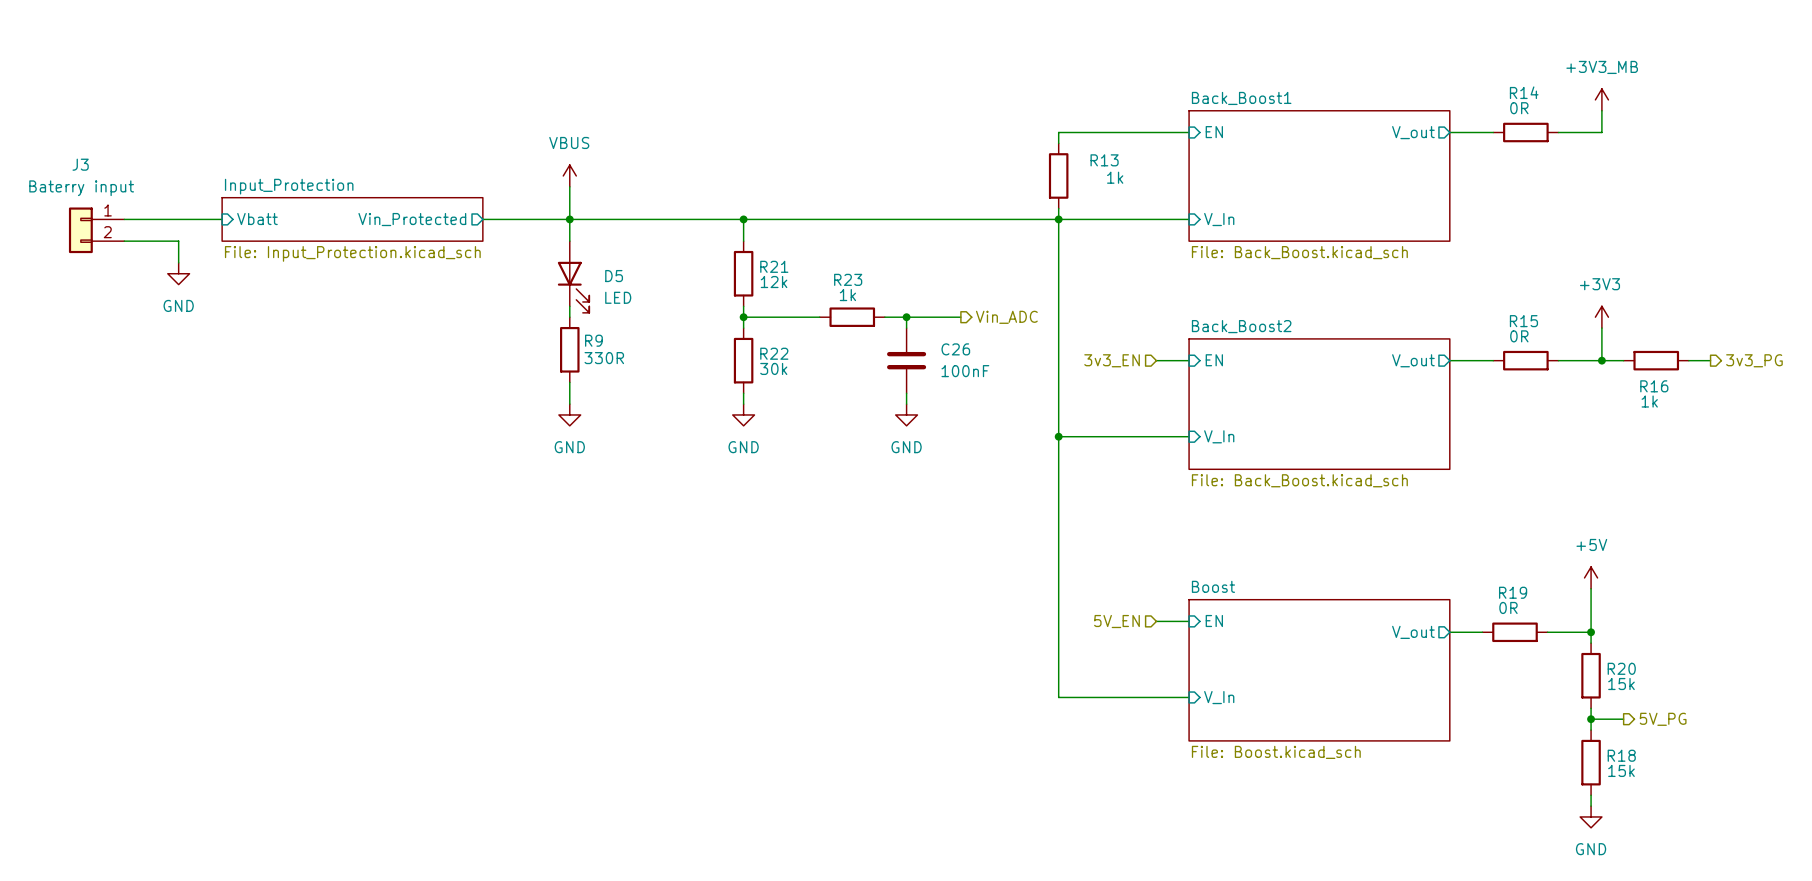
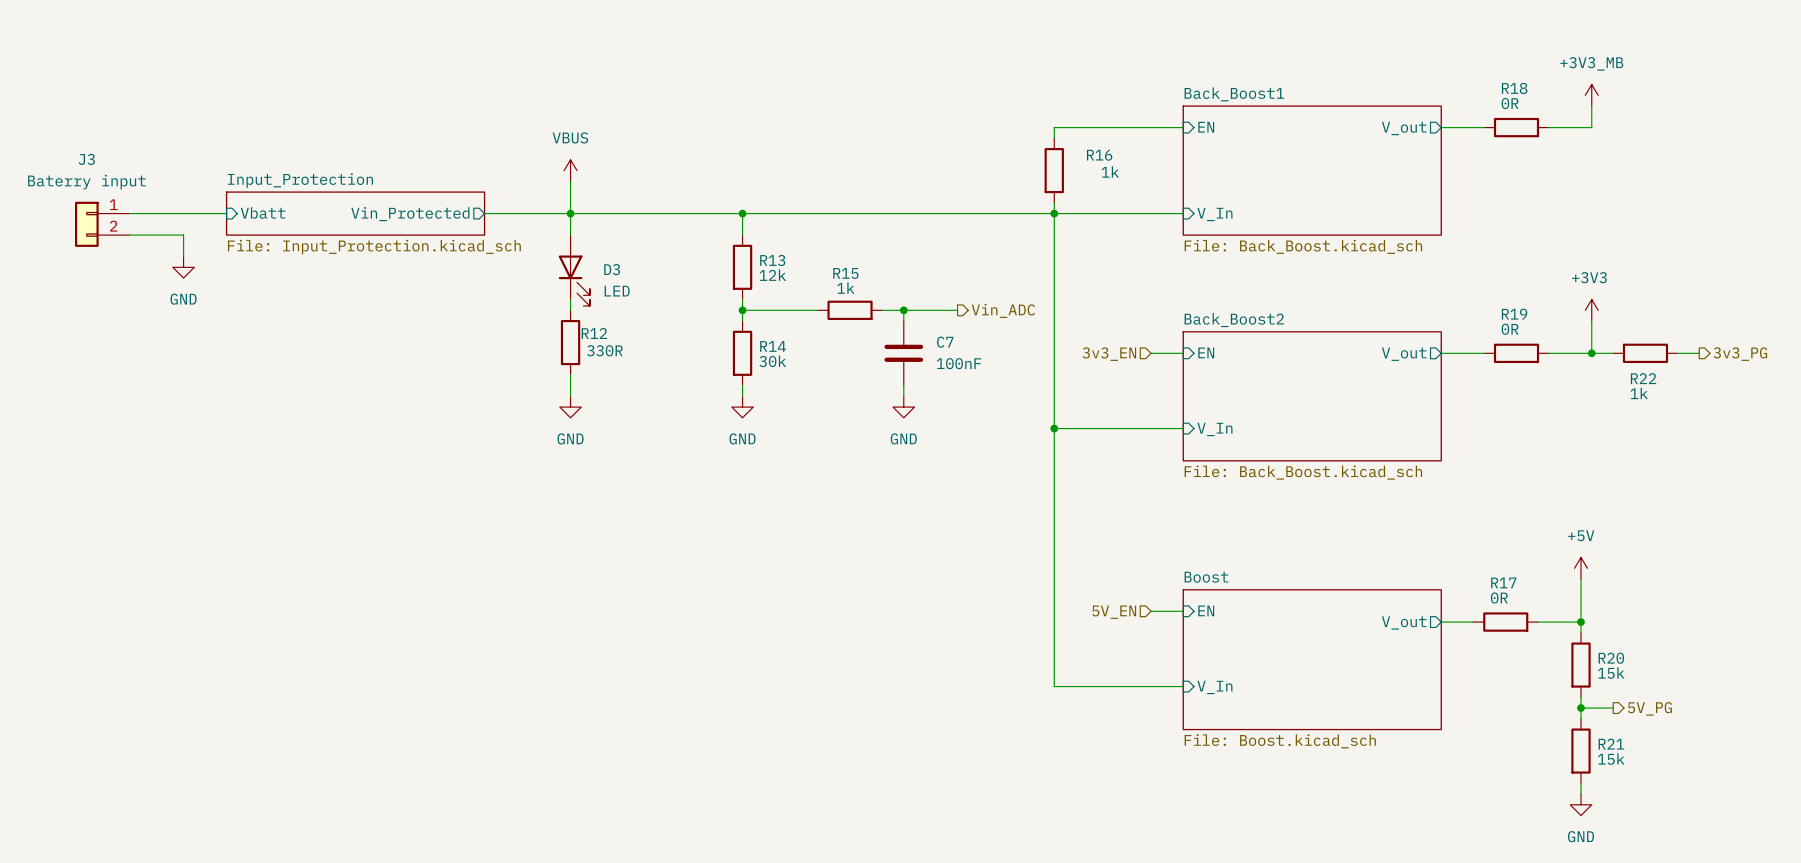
R14 name: R14 (1524, 92) -> R18 (1514, 88)
R13 name: R13 (1104, 160) -> R16 (1099, 155)
R21 name: R21 (774, 266) -> R13 (772, 260)
D5 name: D5 (614, 276) -> D3 (612, 269)
R23 name: R23 (848, 279) -> R15 (845, 273)
R15 name: R15 (1523, 321) -> R19 (1514, 314)
R9 name: R9 (593, 340) -> R12 (594, 333)
C26 name: C26 (955, 349) -> C7 (945, 342)
R22 name: R22 (774, 353) -> R14 (773, 346)
R16 name: R16 (1654, 386) -> R22 (1643, 378)
R19 name: R19 (1513, 592) -> R17 (1503, 582)
R18 name: R18 (1621, 755) -> R21 (1611, 744)

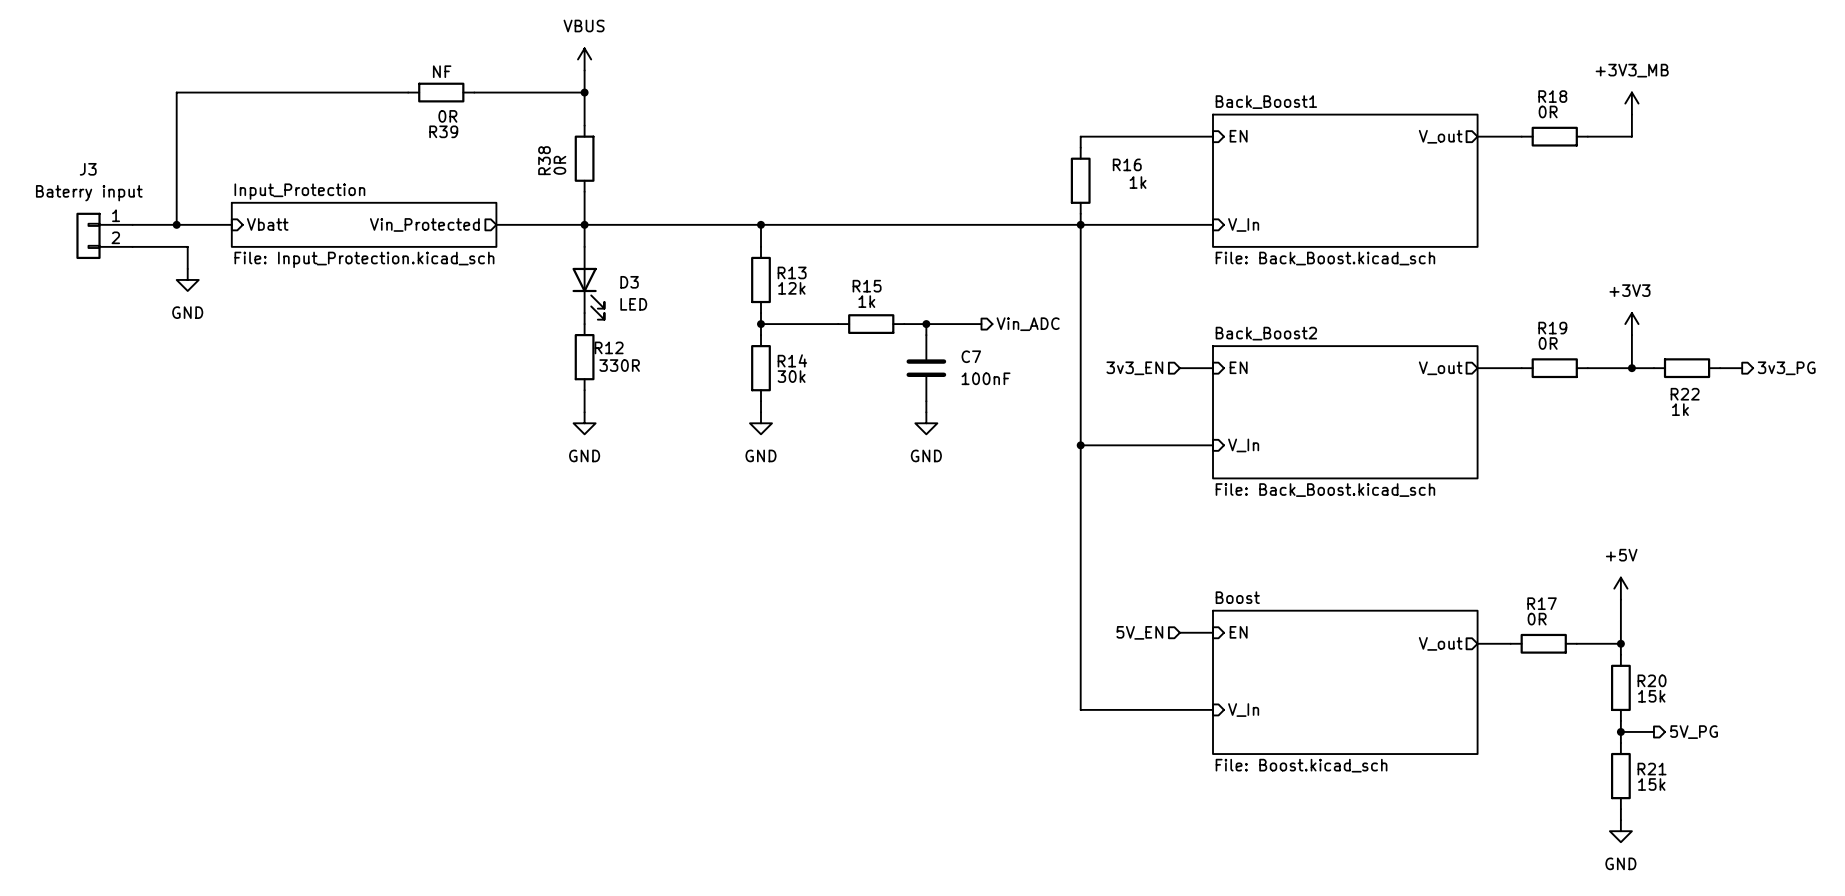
wire: none -> (584, 70) (584, 125)
label: none -> NF (442, 71)
wire: none -> (408, 92) (176, 92) (176, 224)
R39: none -> 0R (441, 92)
wire: none -> (474, 92) (584, 92)
junction: none -> (584, 92)
R38: none -> 0R (584, 158)
power symbol position: VBUS (570, 170) -> VBUS (584, 59)
junction: none -> (176, 224)

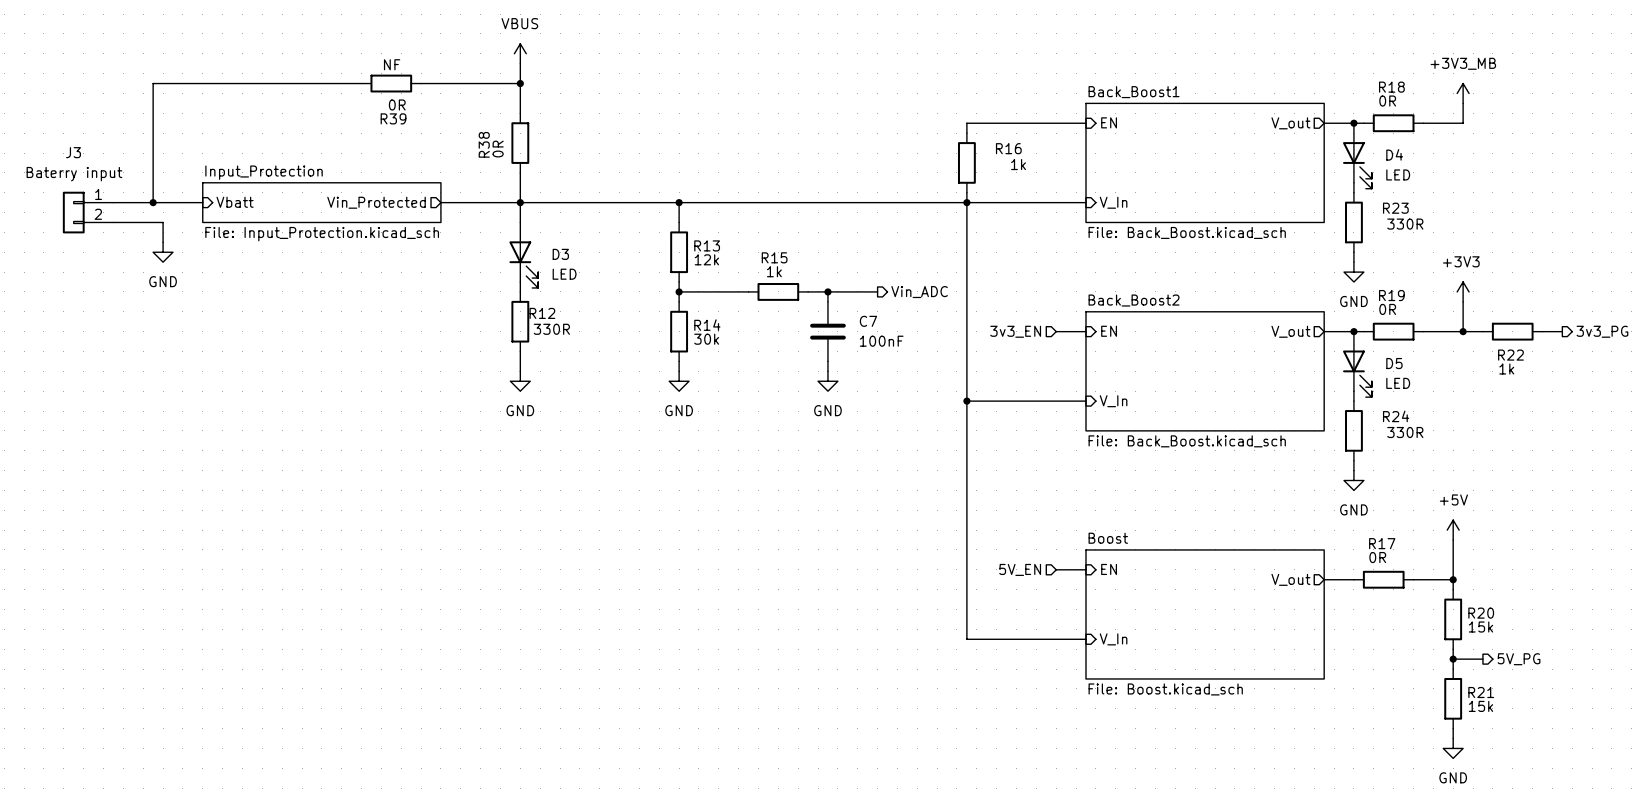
junction: none -> (1353, 123)
D4: none -> LED (1357, 155)
wire: none -> (1353, 182) (1353, 192)
R23: none -> 330R (1353, 222)
wire: none -> (1353, 252) (1353, 262)
power symbol: none -> GND (1353, 272)
junction: none -> (1353, 331)
D5: none -> LED (1357, 364)
wire: none -> (1353, 391) (1353, 401)
R24: none -> 330R (1353, 430)
wire: none -> (1353, 460) (1353, 470)
power symbol: none -> GND (1353, 480)

